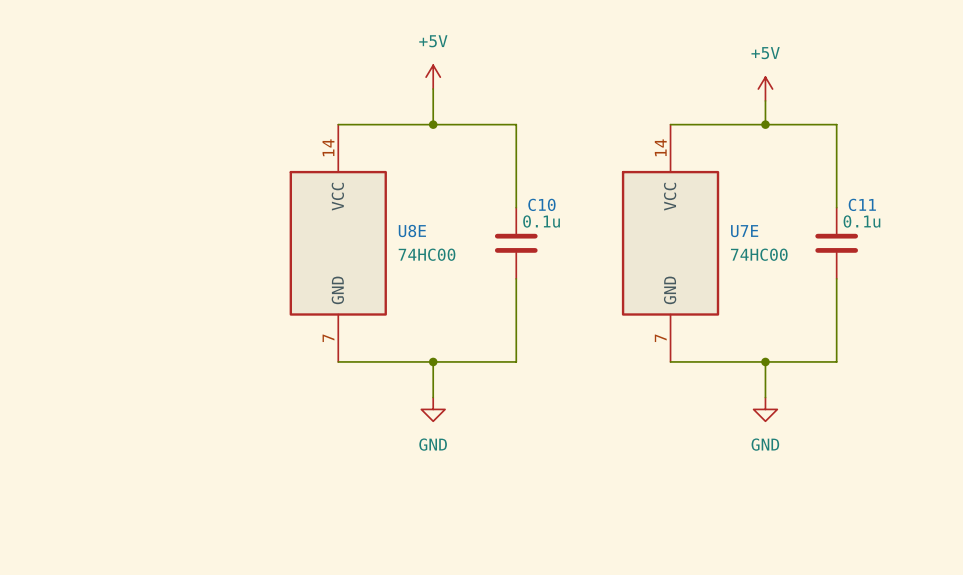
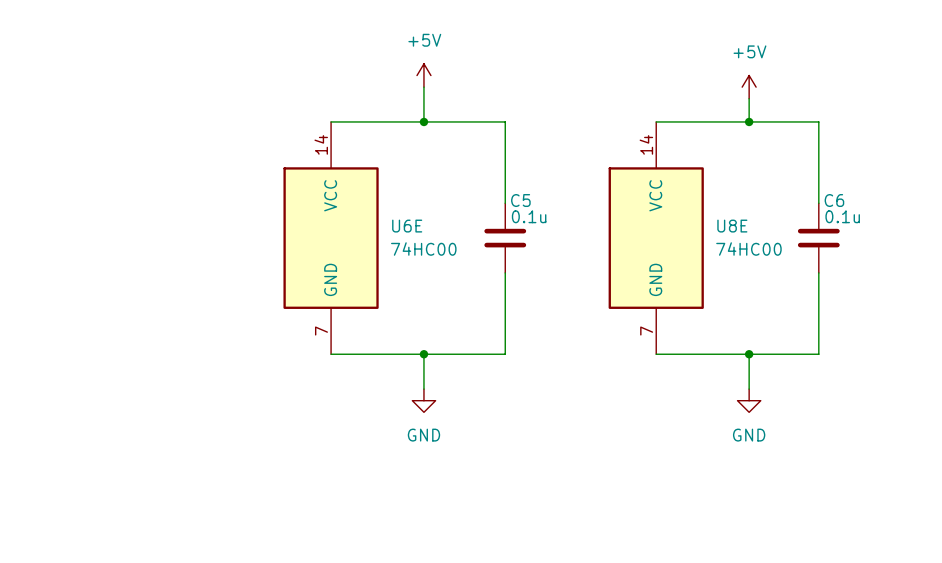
C10 name: C10 (541, 204) -> C5 (520, 200)
C11 name: C11 (862, 204) -> C6 (834, 200)
U8E name: U8E (412, 231) -> U6E (407, 226)
U7E name: U7E (744, 231) -> U8E (732, 226)

